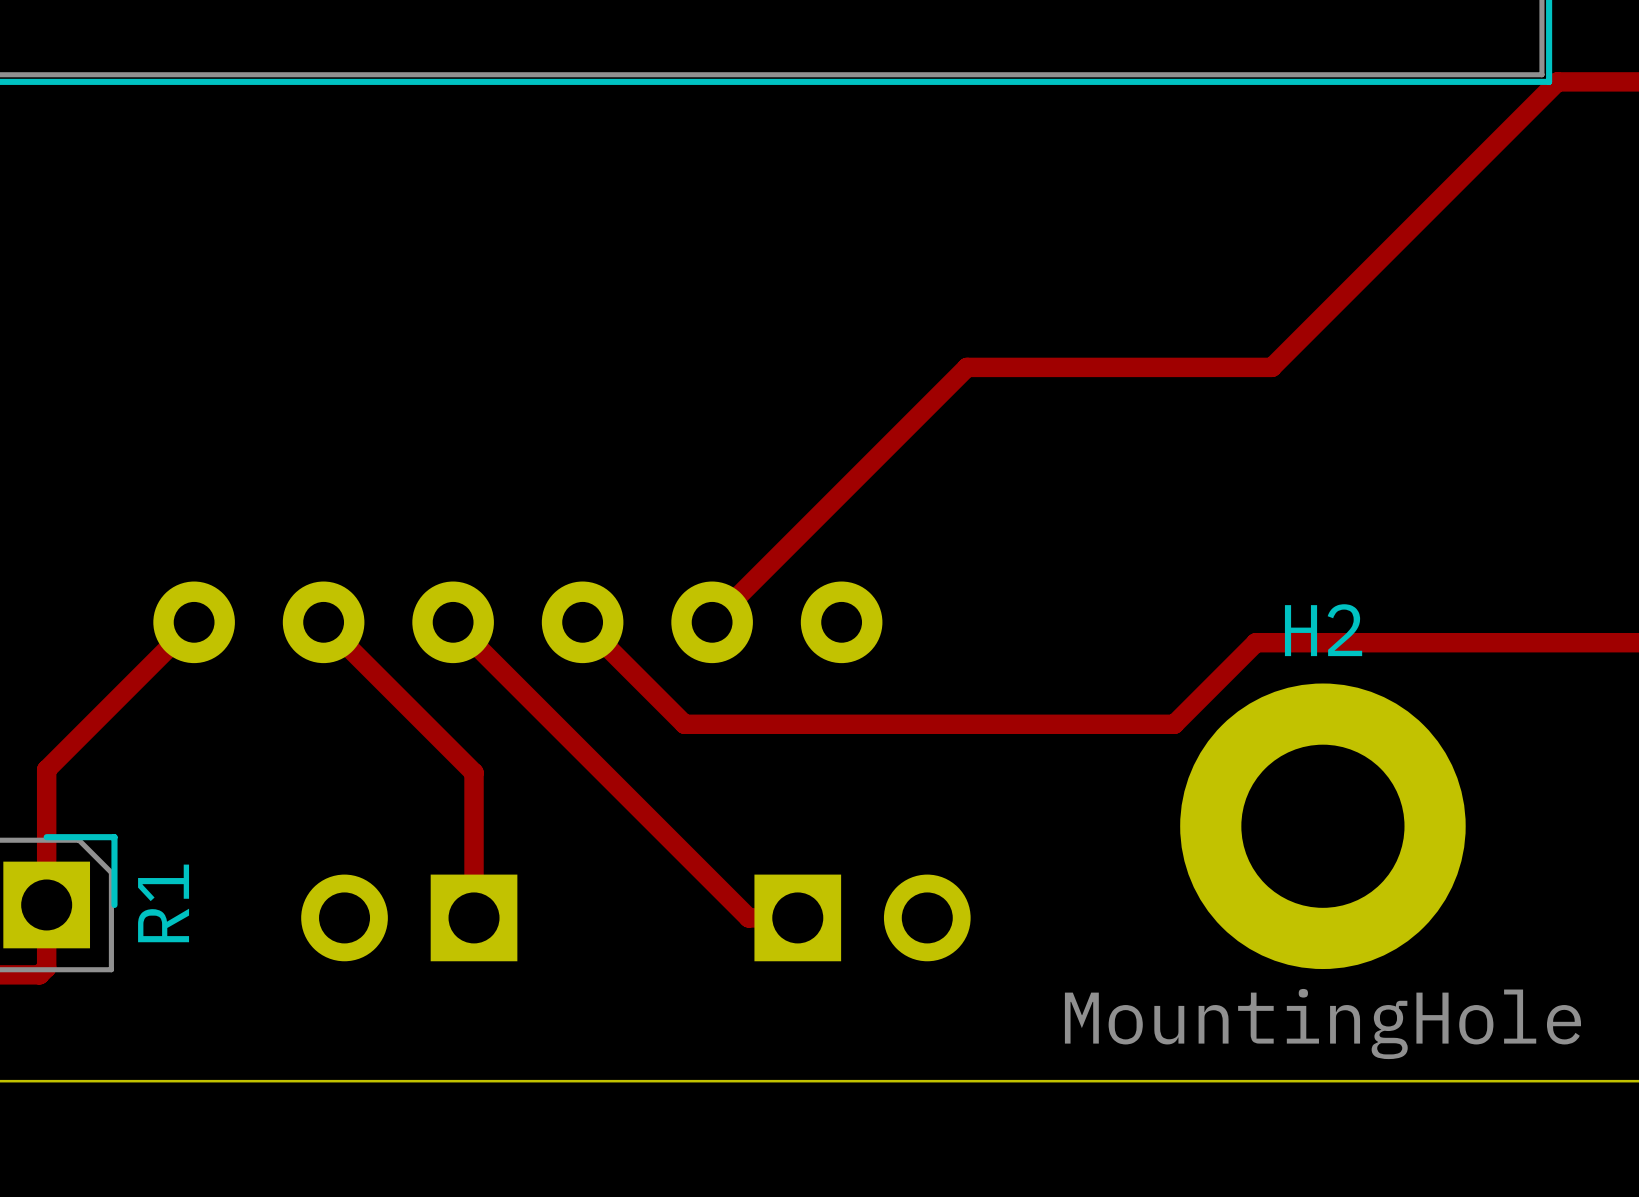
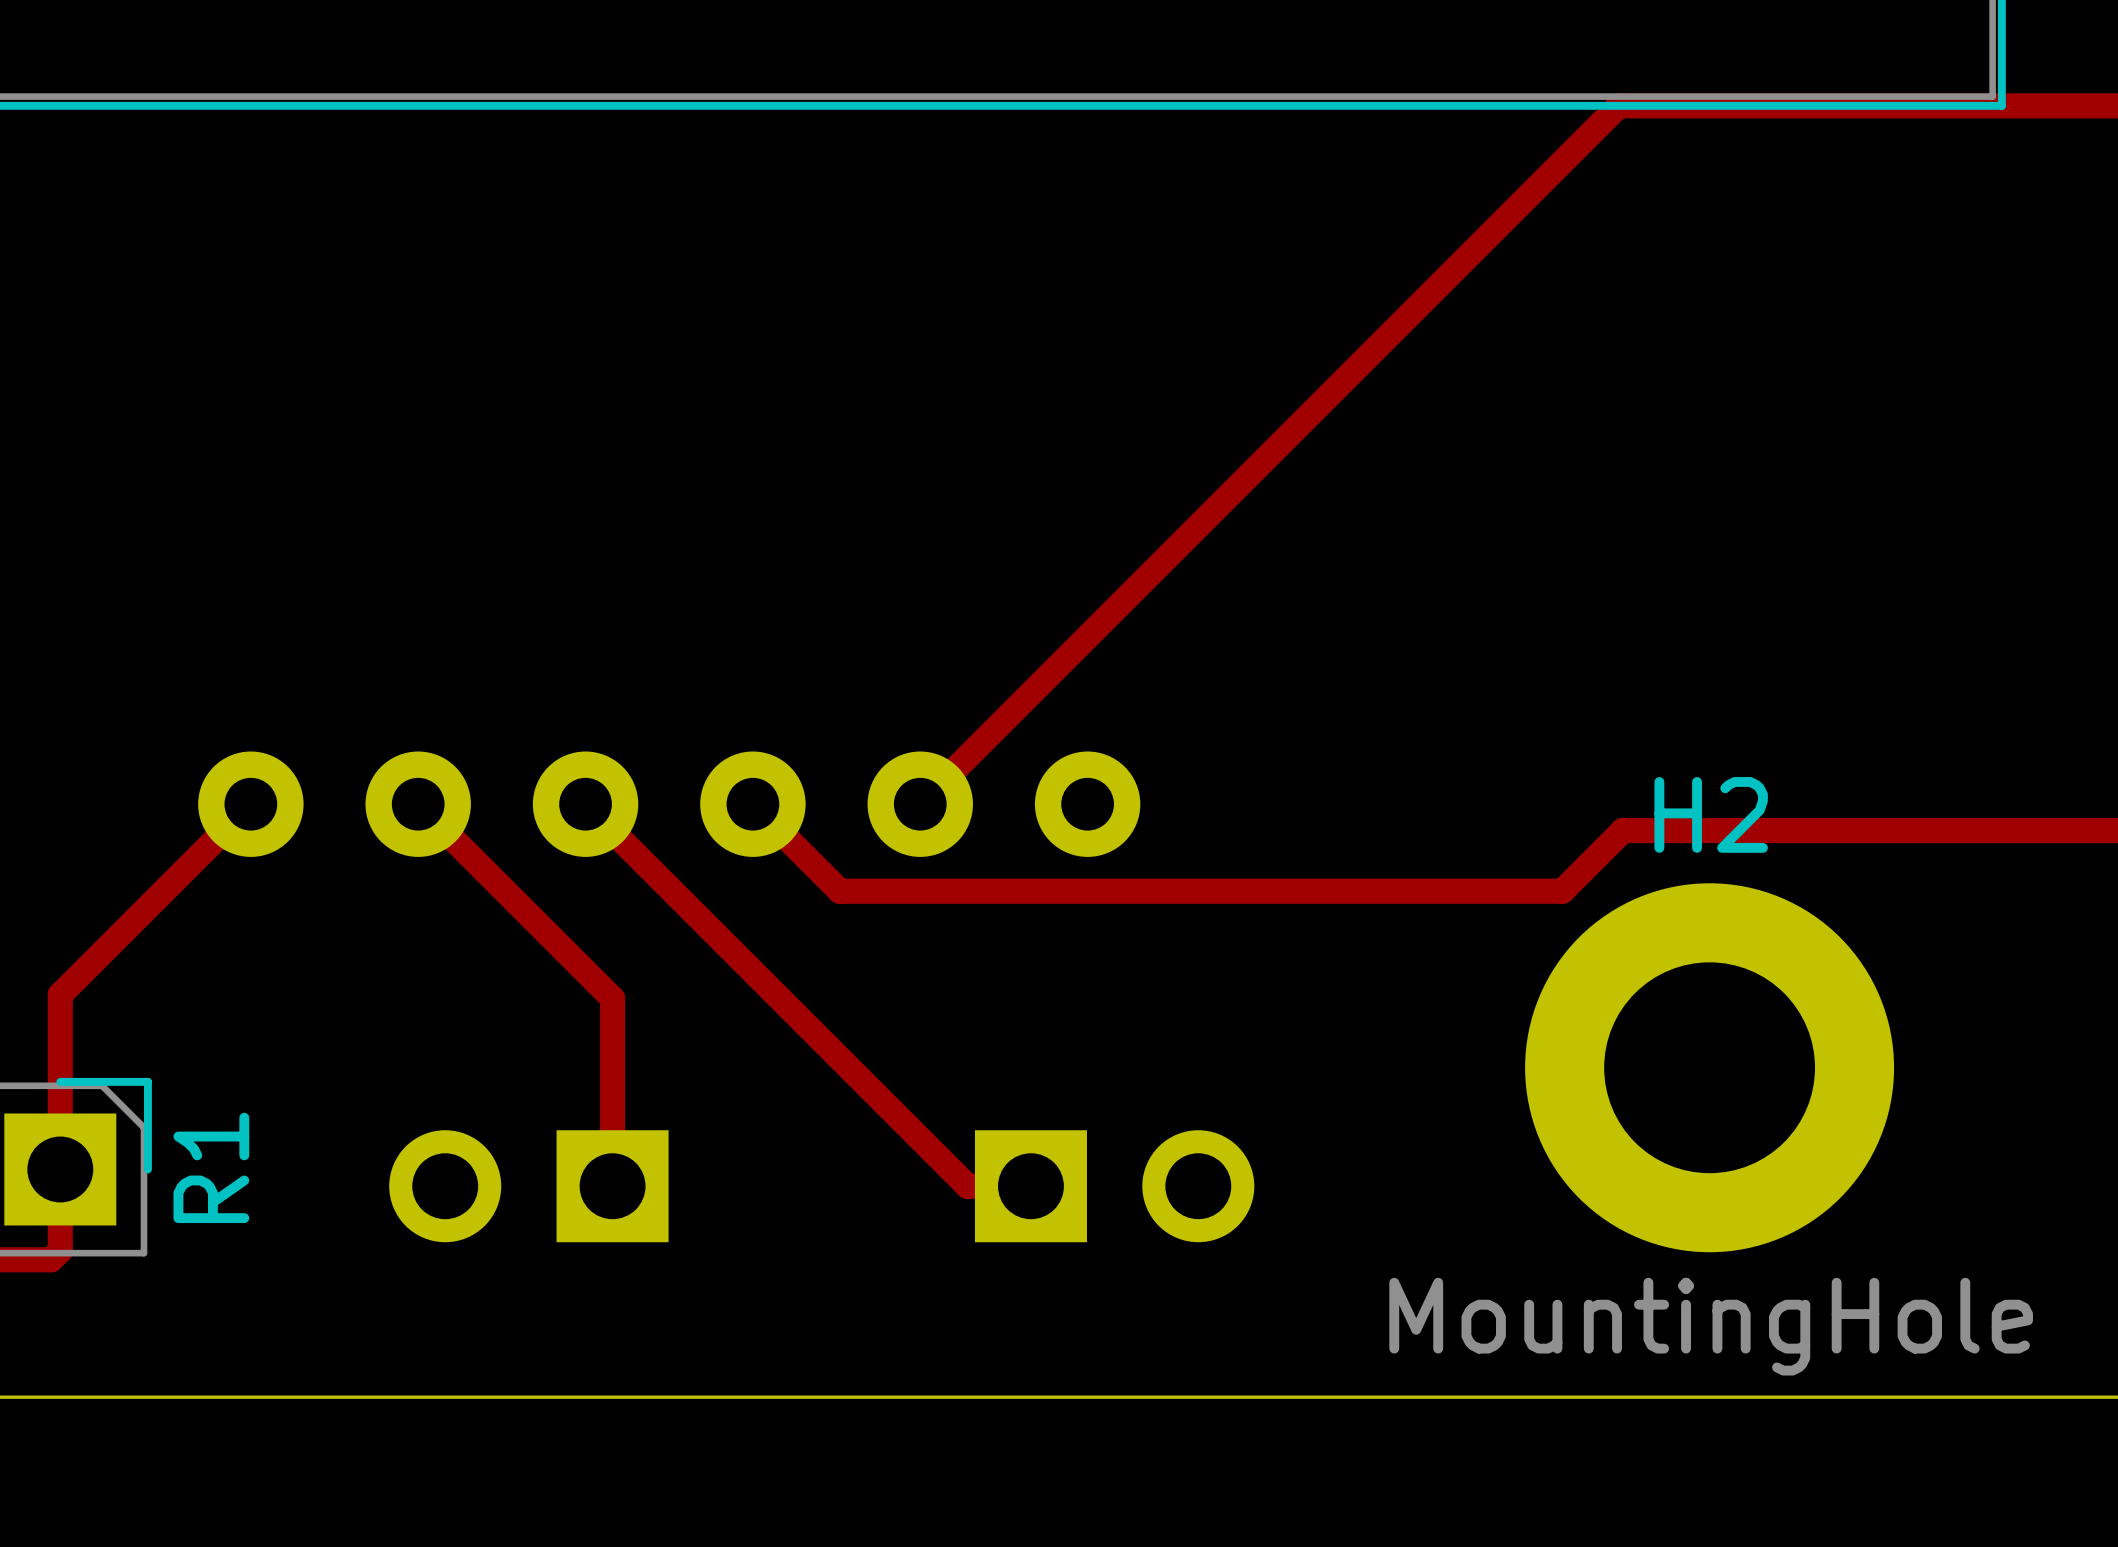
top track: (1557, 81) (1271, 367) (967, 367) -> (2012, 105) (1618, 105) (1249, 474)
top track: (649, 689) (684, 724) (1174, 724) (1208, 689) -> (839, 891) (1562, 891)

